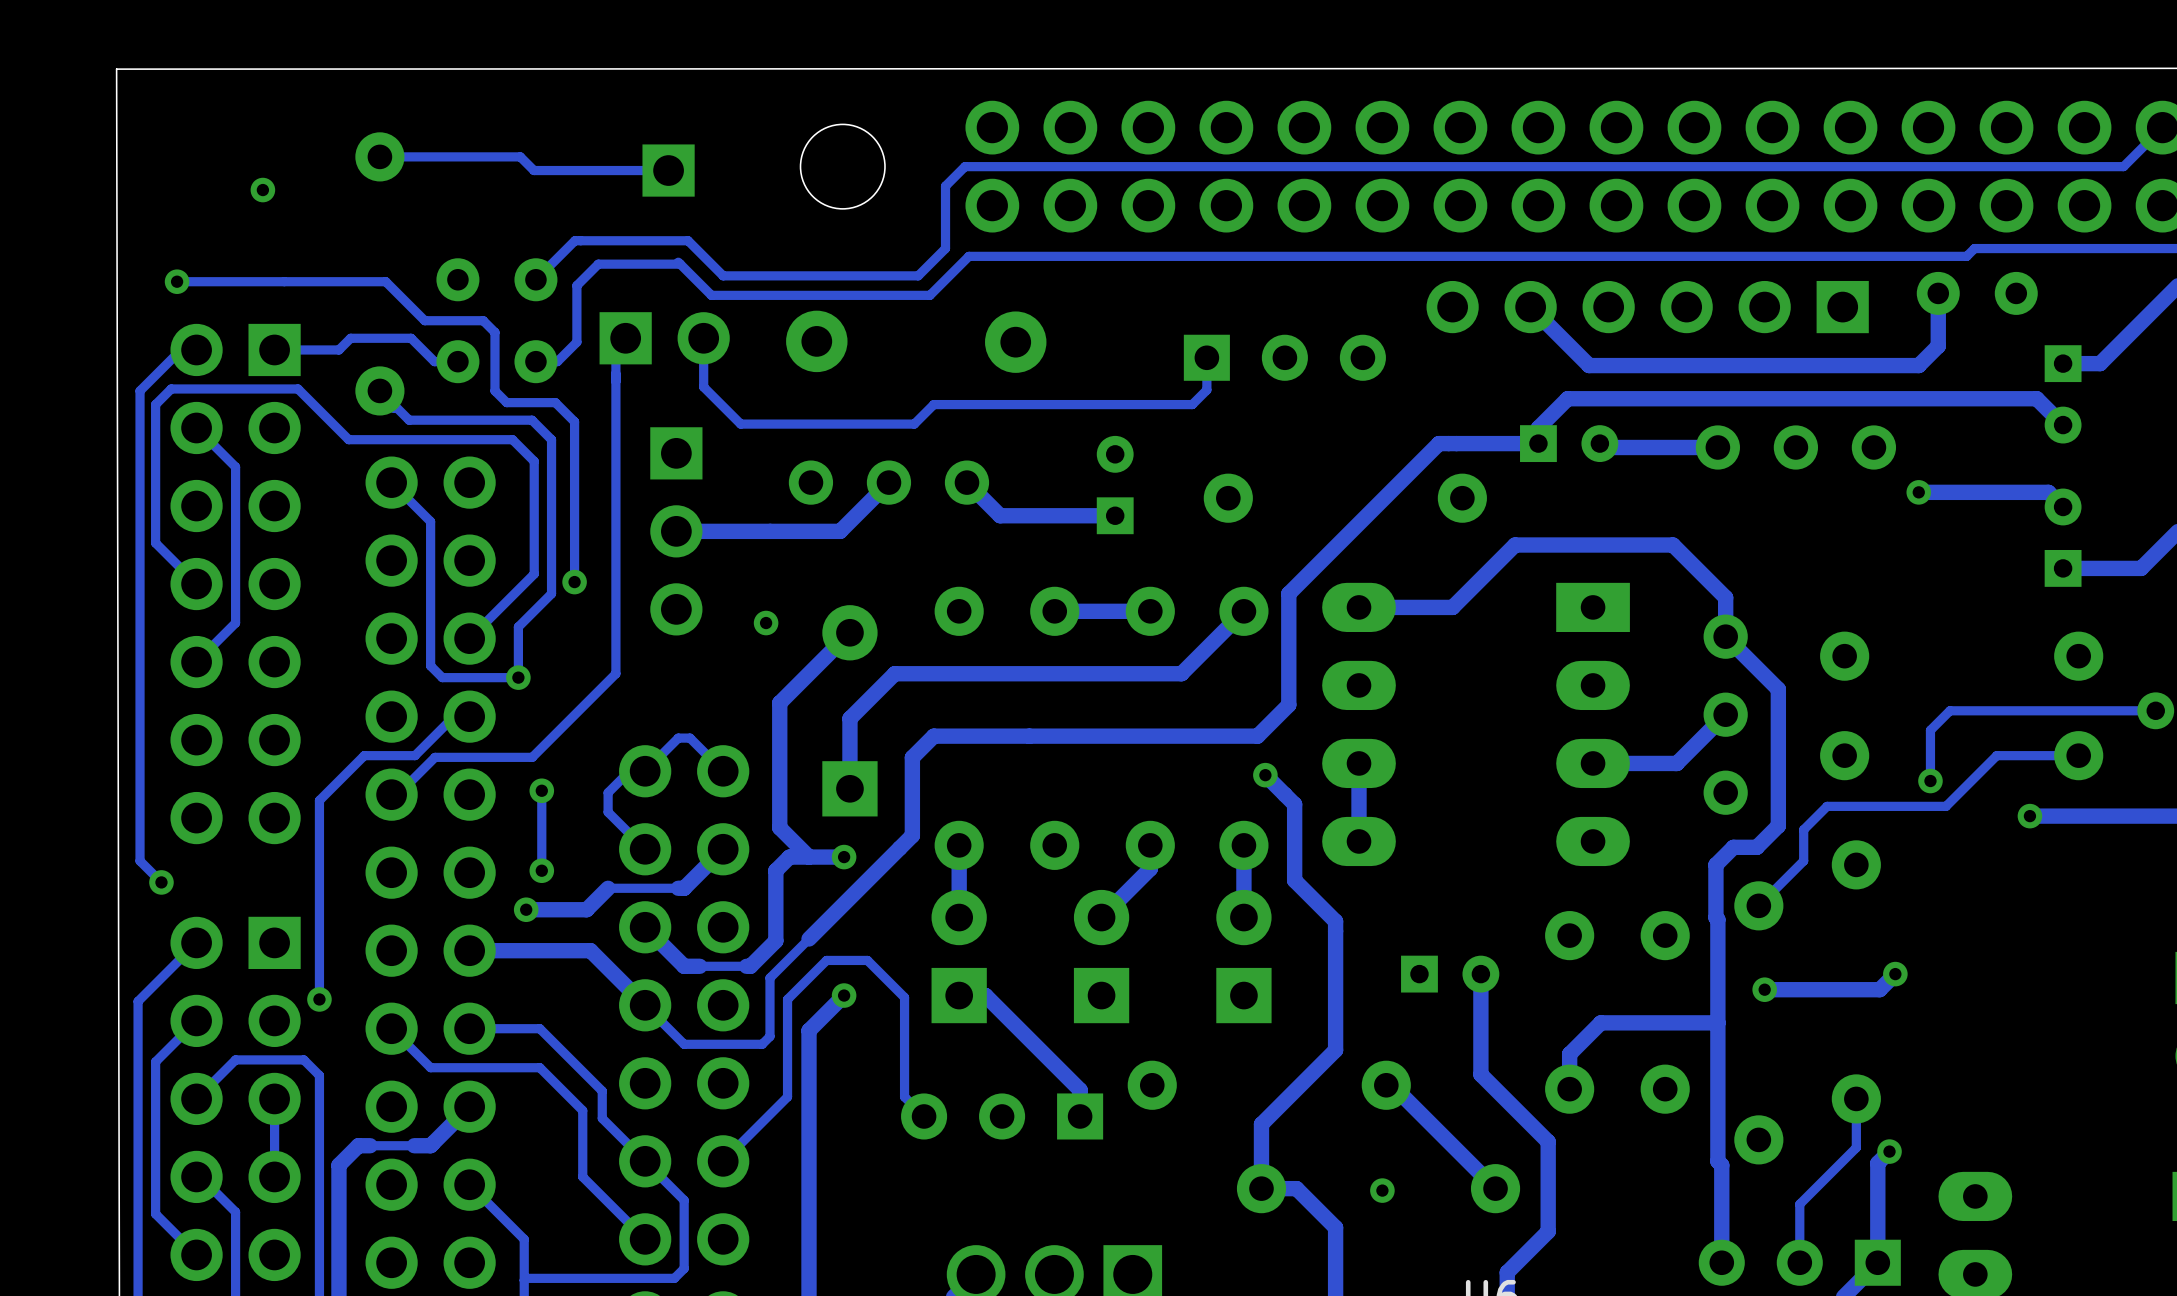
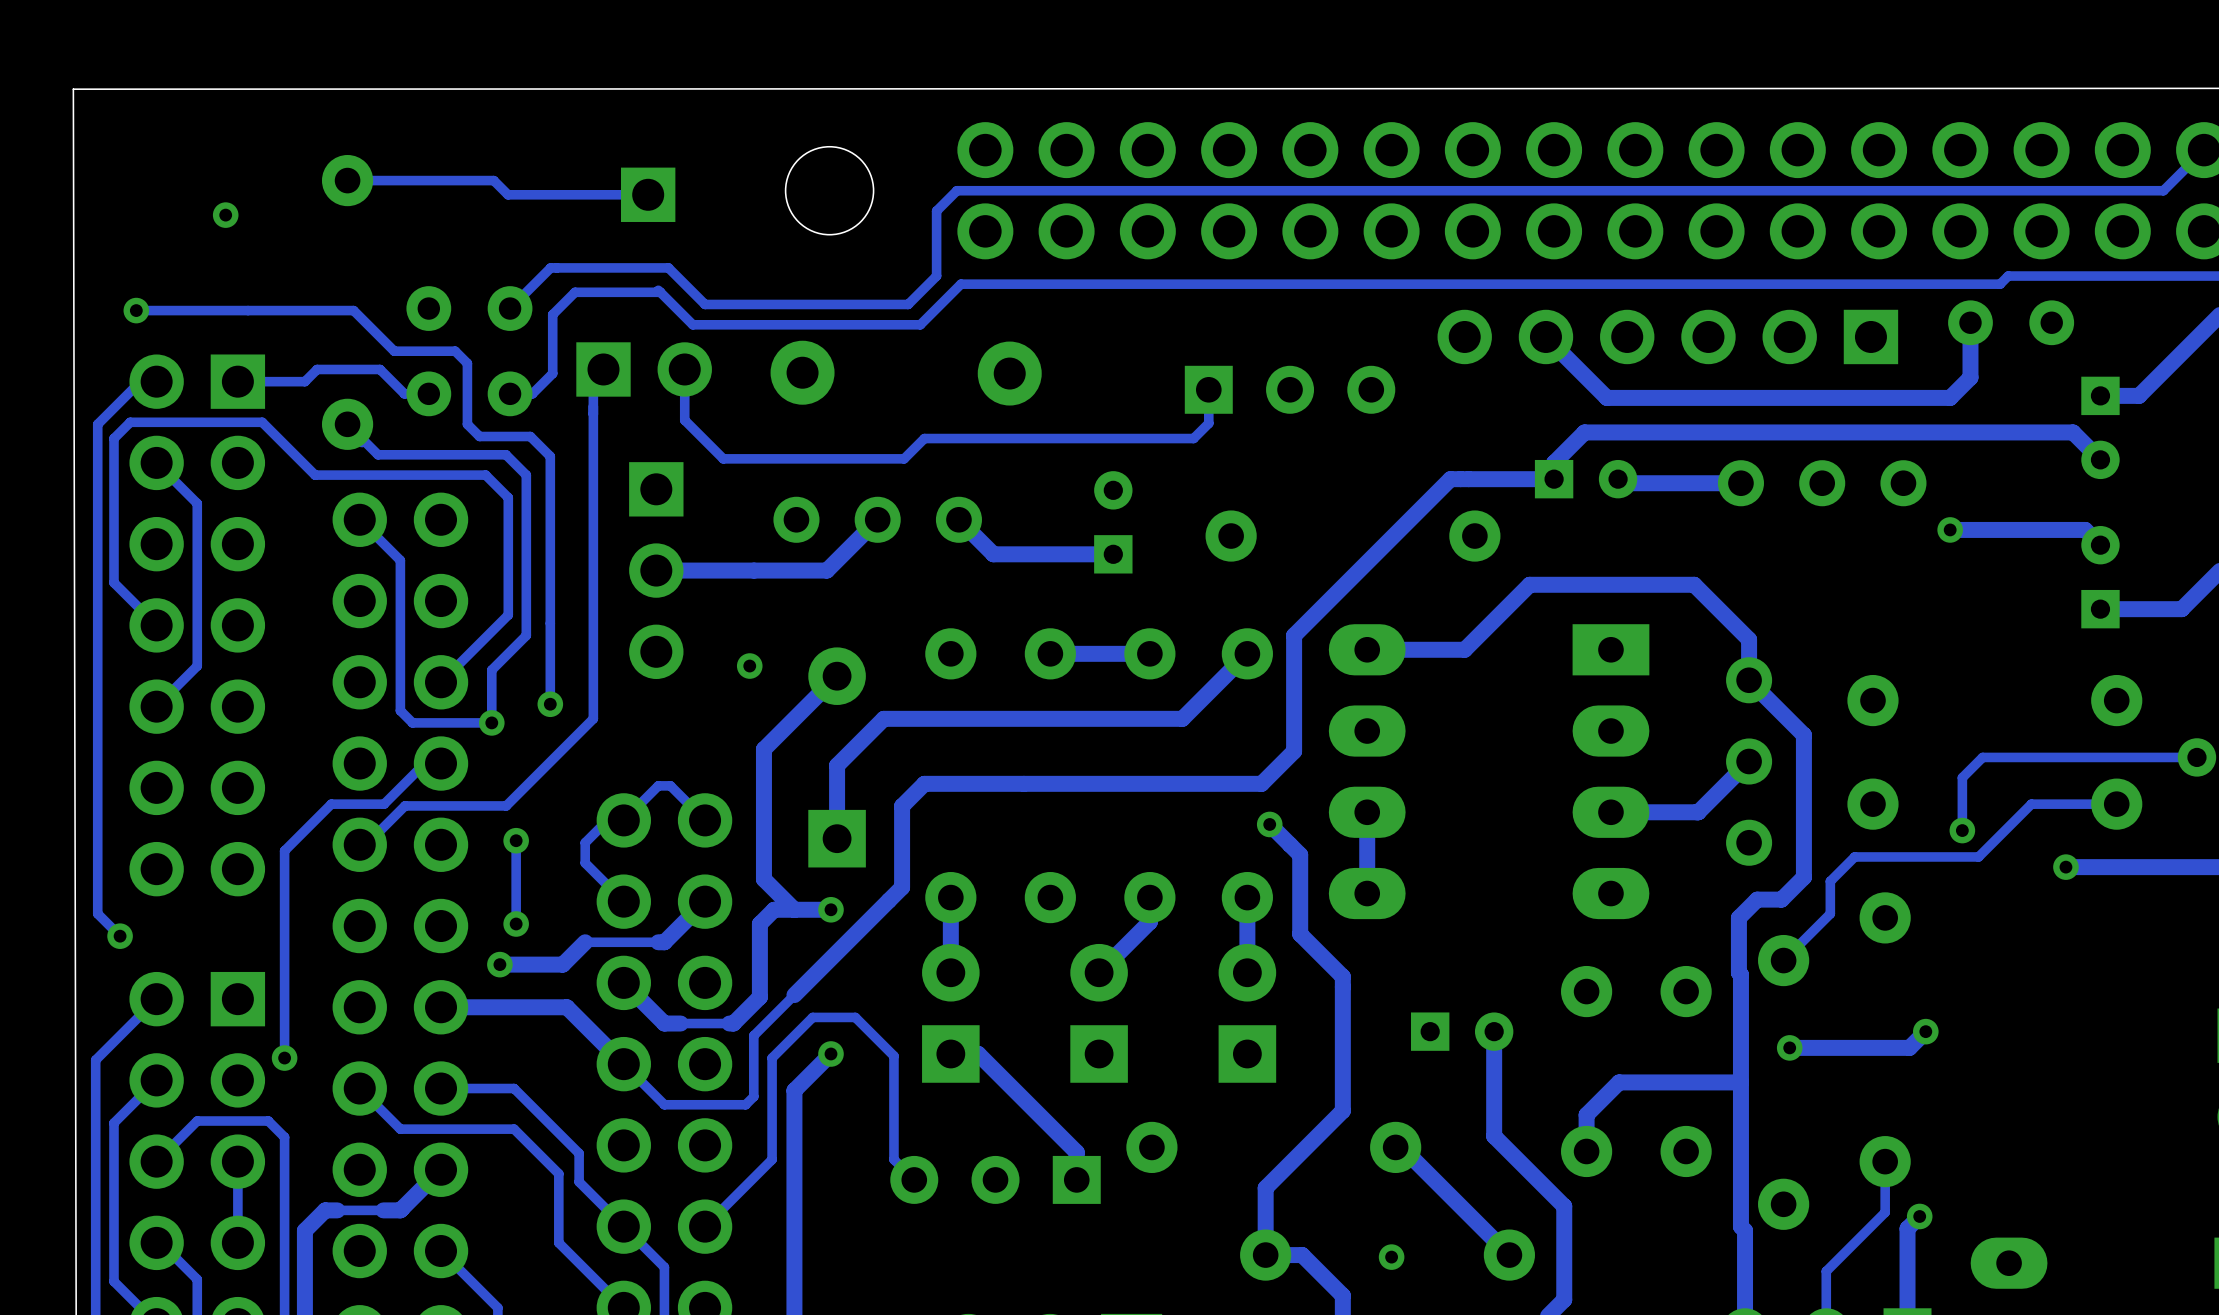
track: none -> (550, 623) (550, 704)
via position: (574, 582) -> (550, 704)

